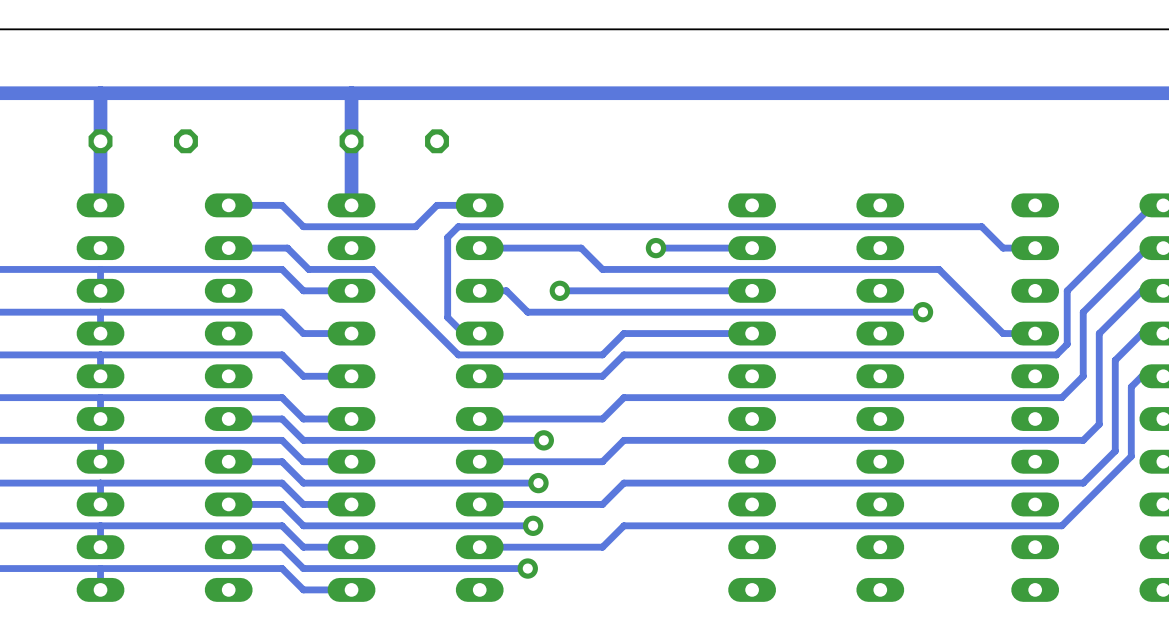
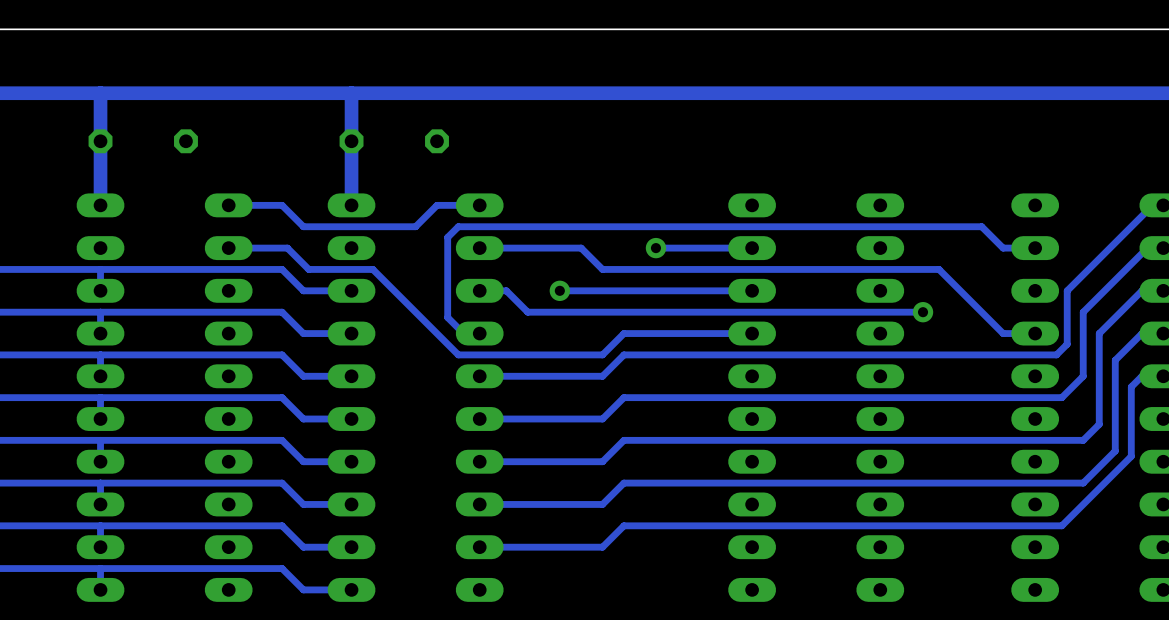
track: (228, 419) (282, 419) (303, 440) (543, 440) -> none
via: (543, 440) -> none
track: (228, 461) (282, 461) (303, 483) (538, 483) -> none
via: (538, 483) -> none
track: (228, 504) (282, 504) (303, 525) (533, 525) -> none
via: (533, 525) -> none
track: (228, 547) (282, 547) (303, 568) (527, 568) -> none
via: (527, 568) -> none

